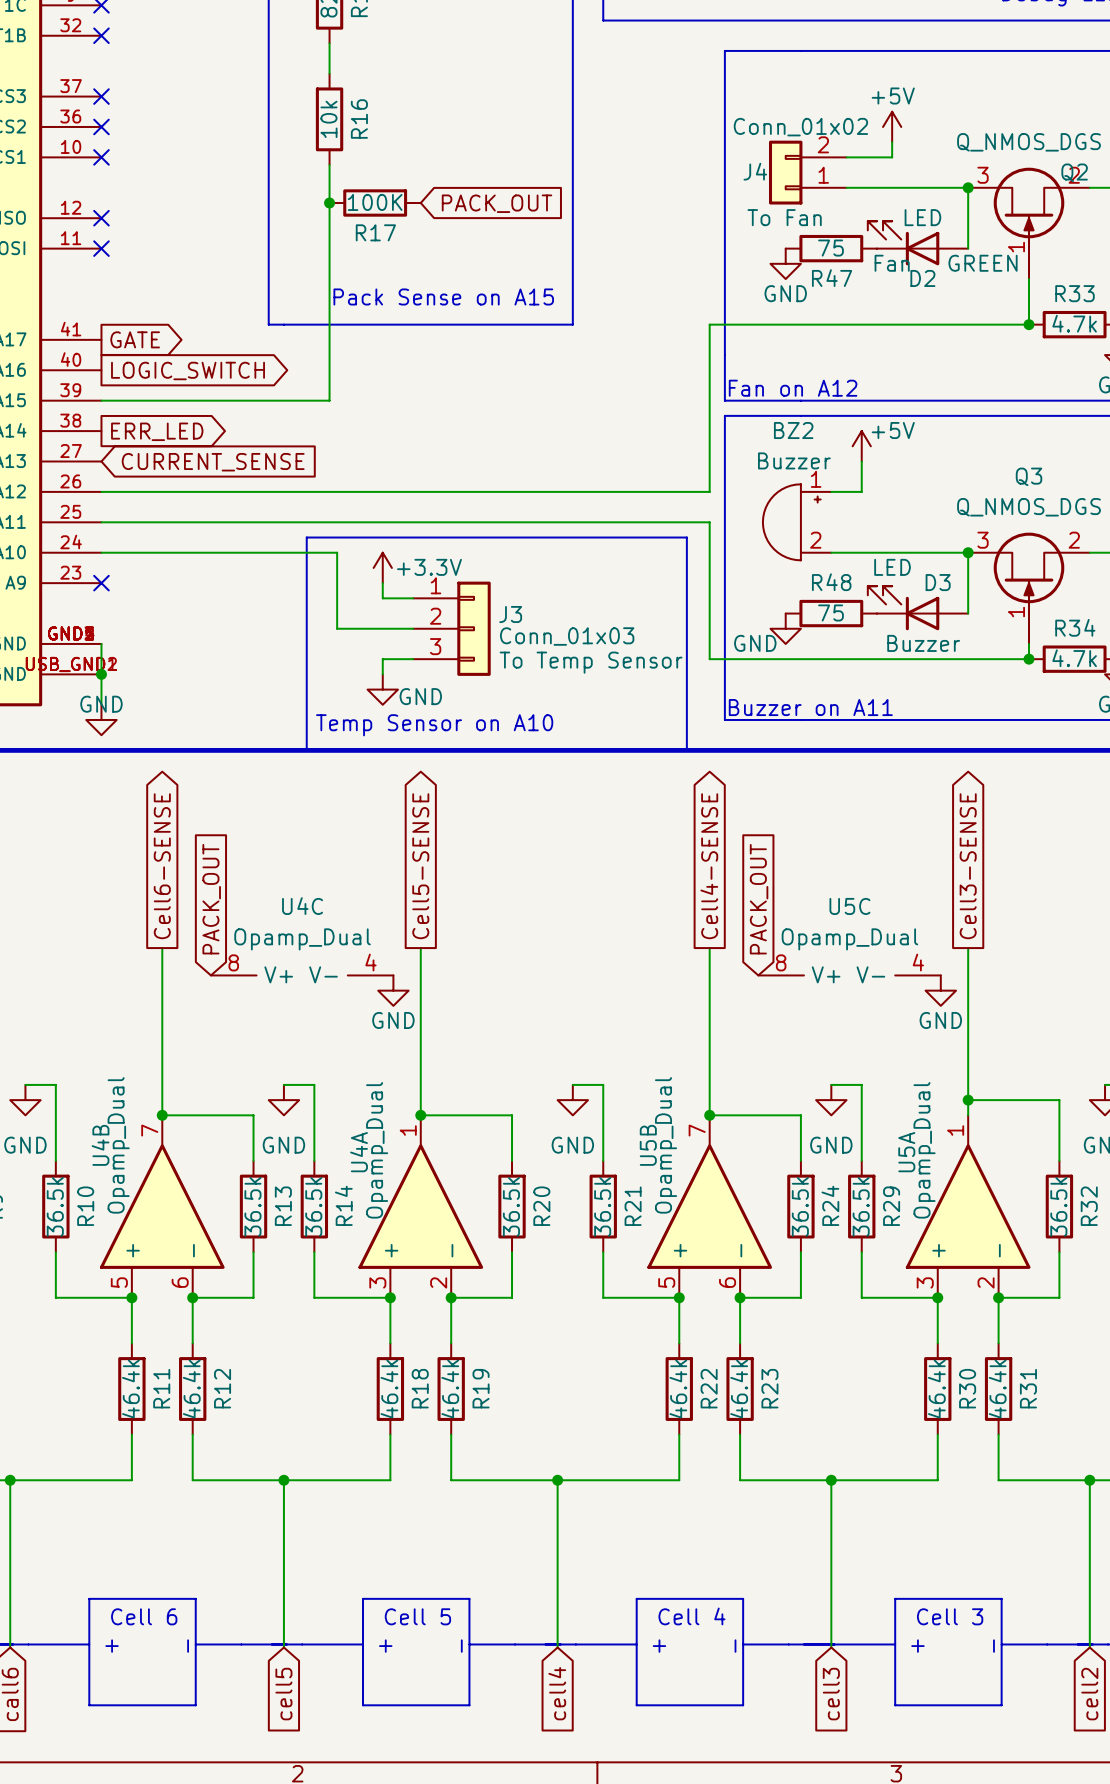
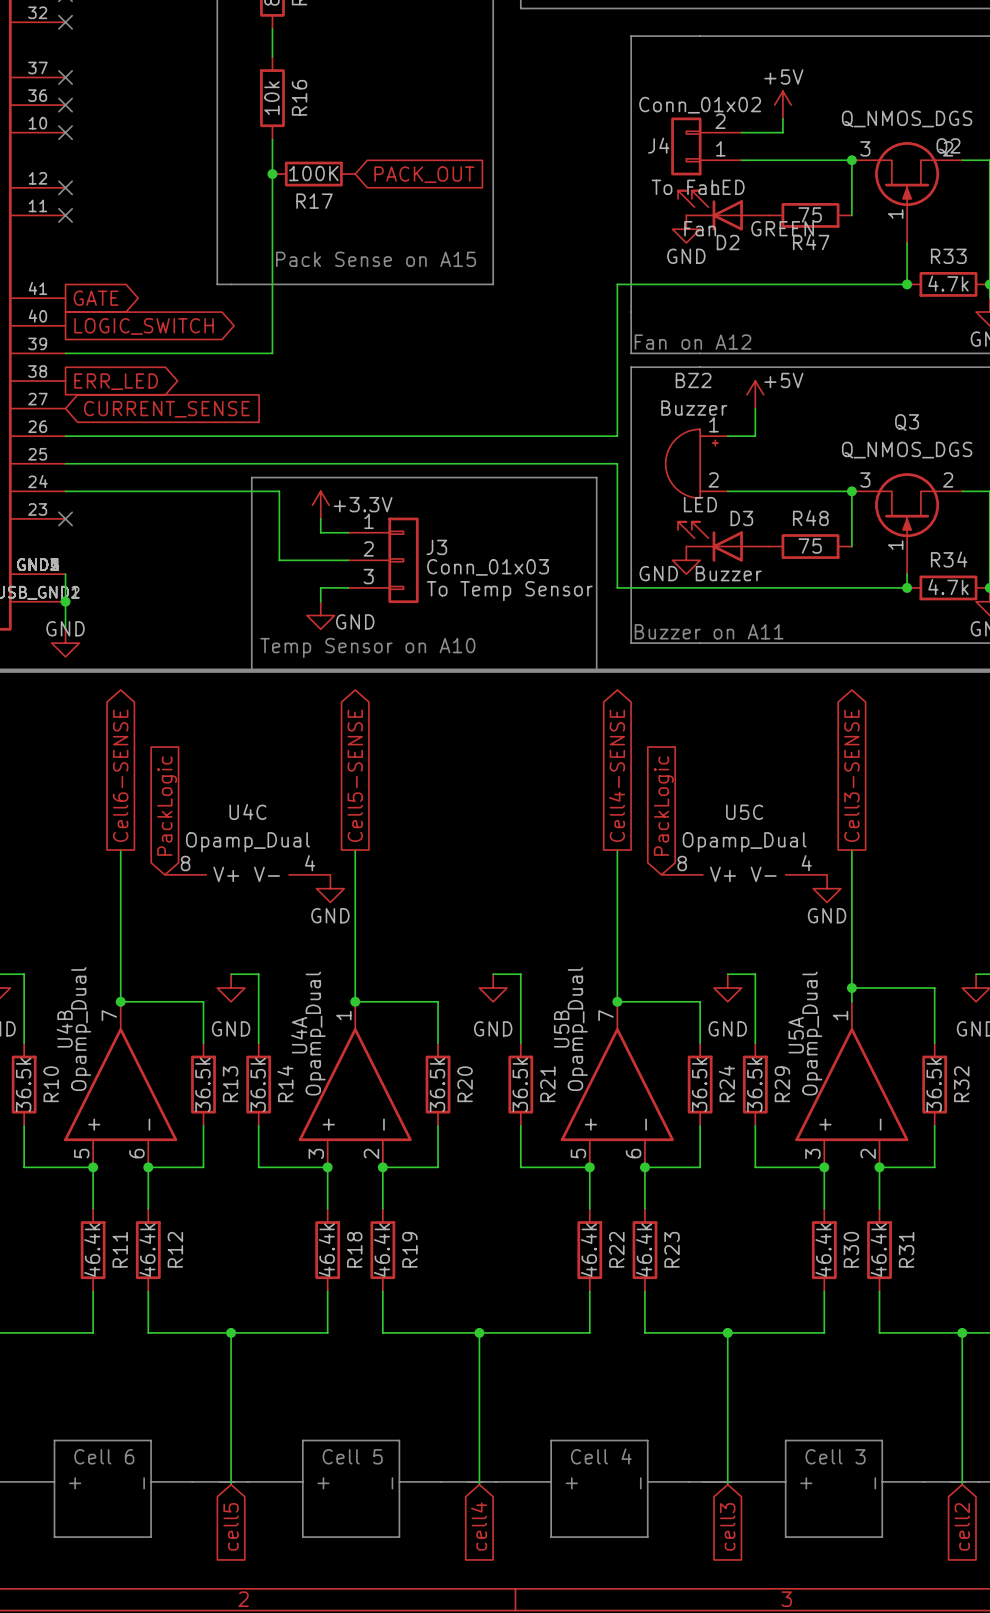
D2 position: (918, 243) -> (723, 210)
R47 position: (831, 248) -> (810, 215)
D3 position: (918, 608) -> (723, 541)
R48 position: (831, 613) -> (810, 546)
global label: PACK_OUT (211, 899) -> PackLogic (167, 806)
global label: PACK_OUT (759, 899) -> PackLogic (663, 806)

